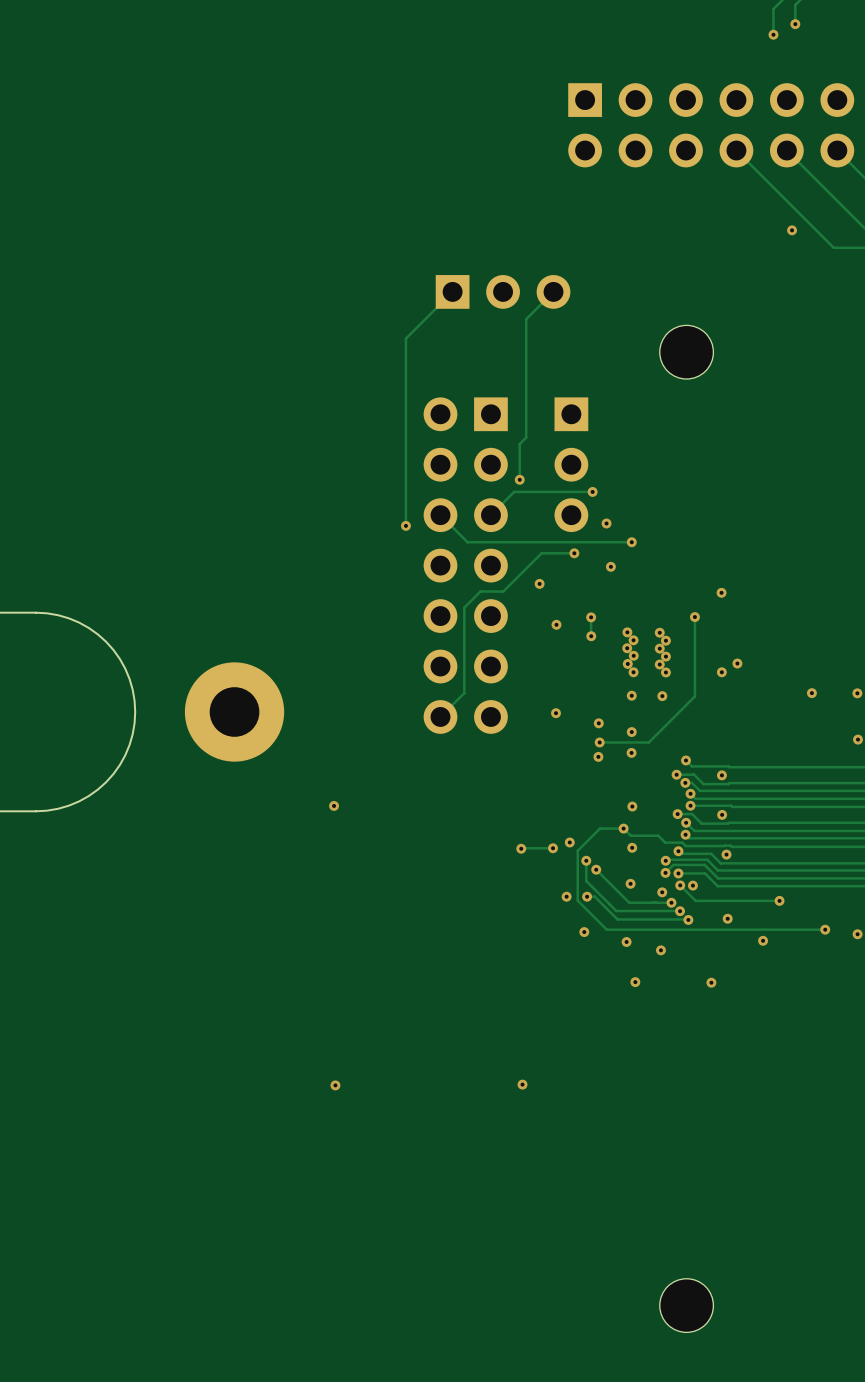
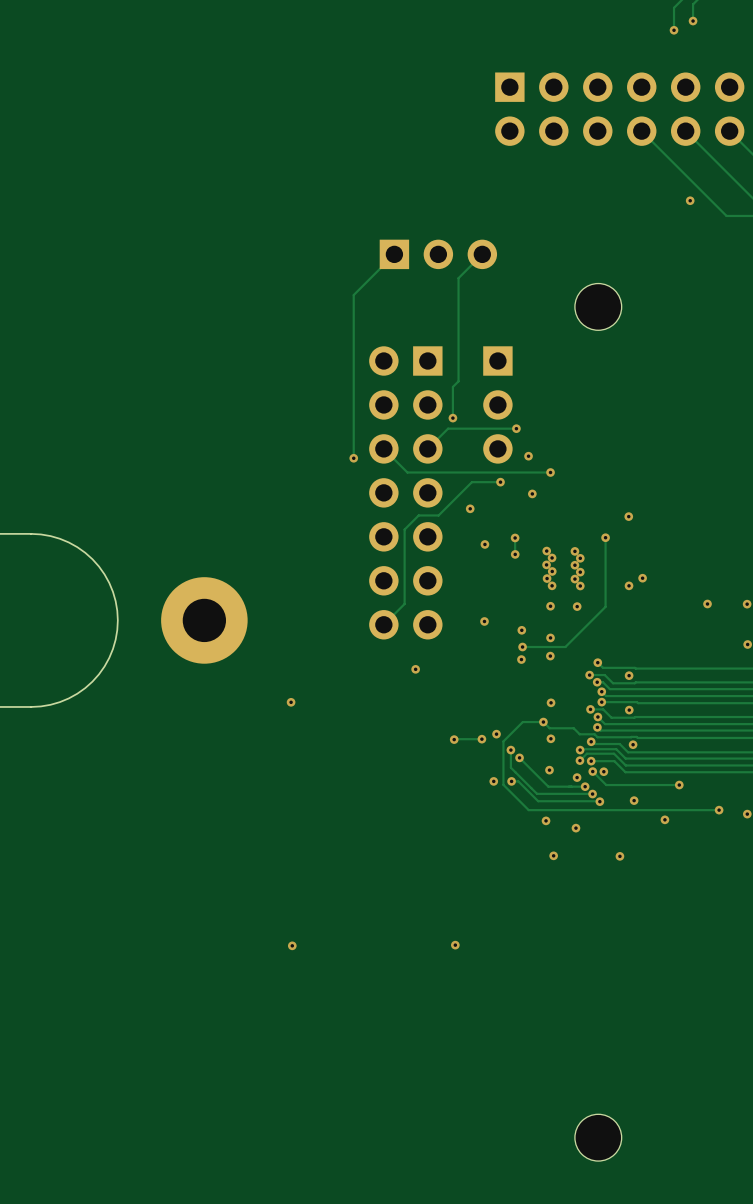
via: none -> (415, 669)
via: (584, 932) -> none

